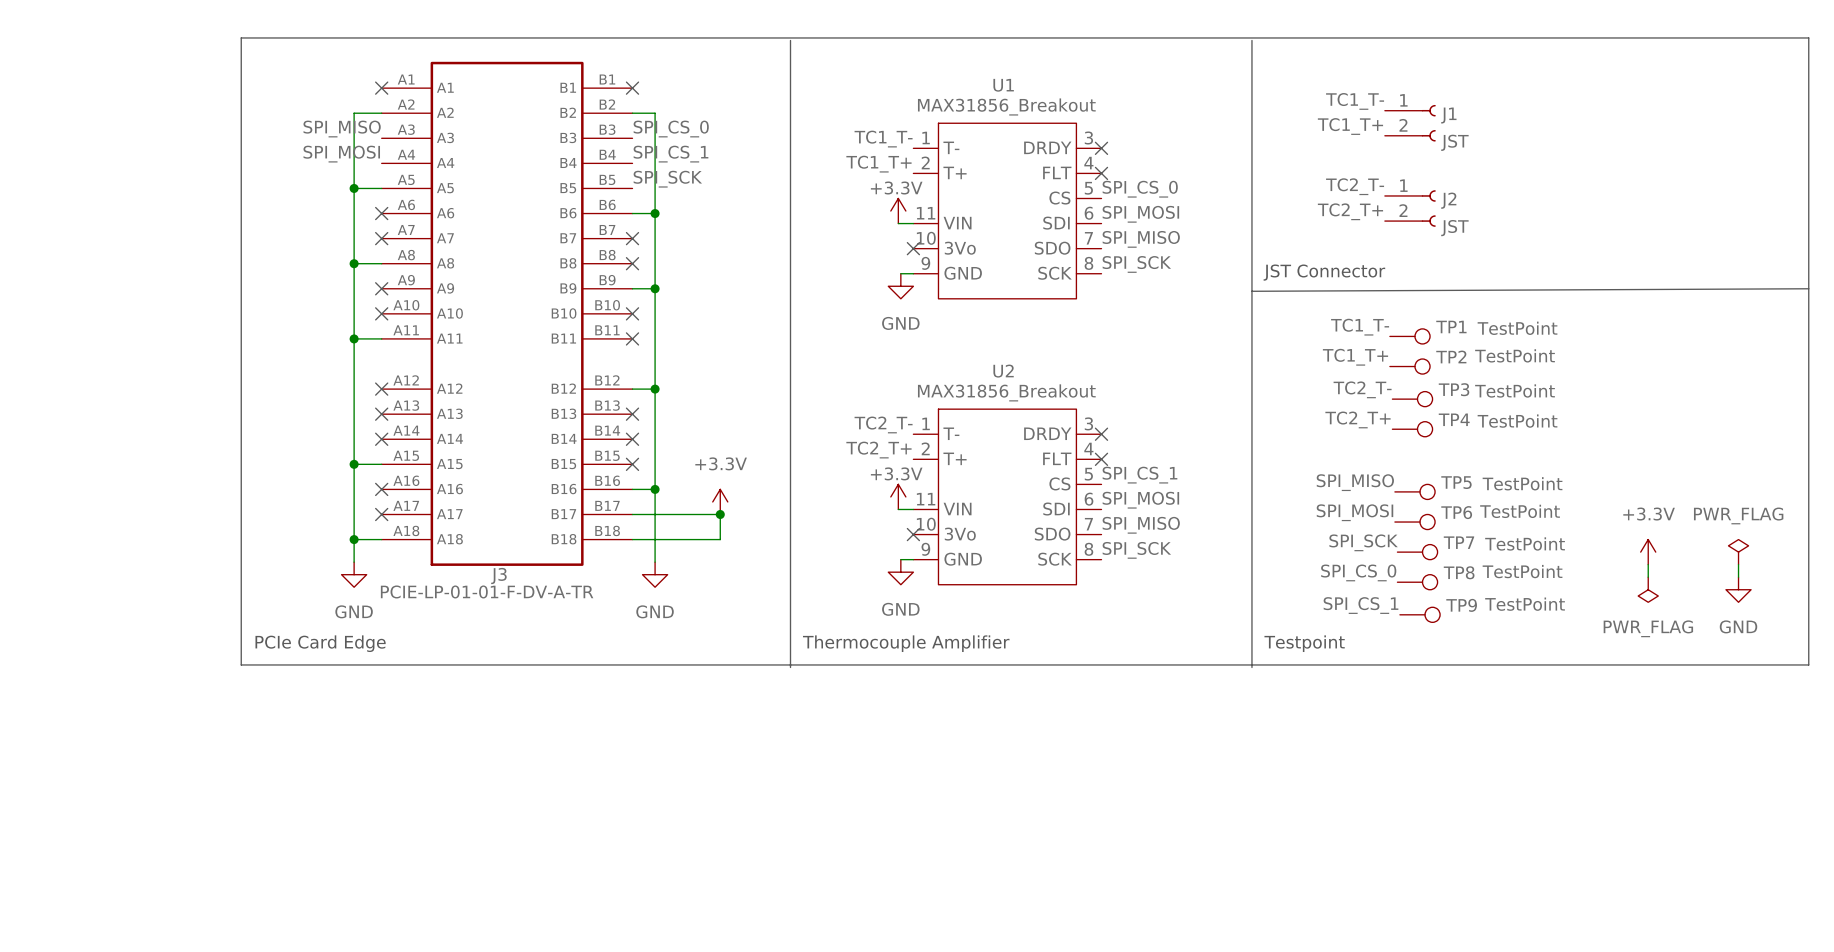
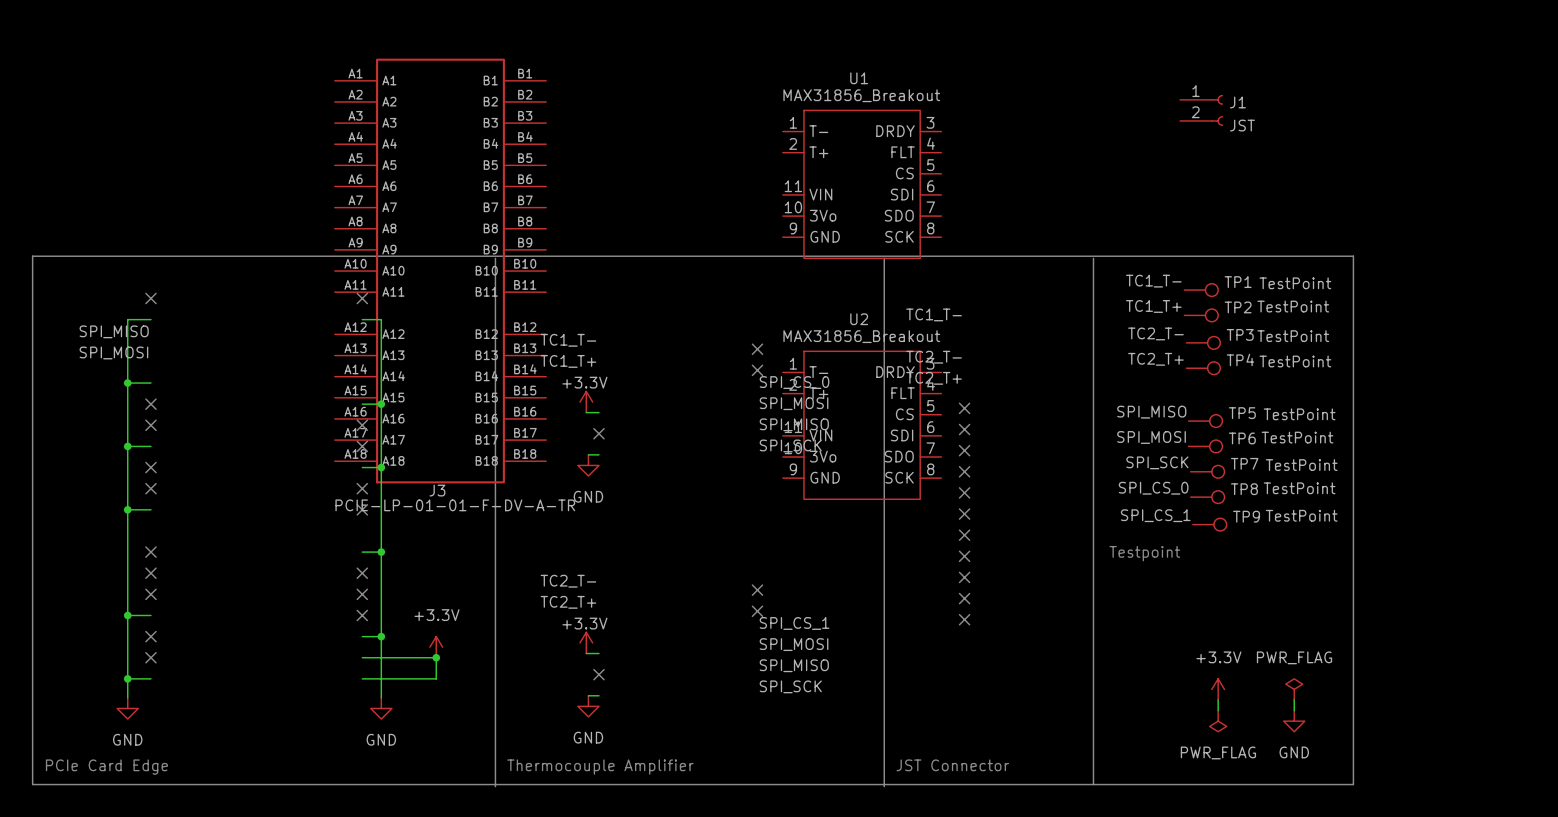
line: (241, 37) (241, 664) (1808, 664) (1808, 37) (241, 37) -> none
line: (790, 40) (790, 667) -> none
line: (1251, 40) (1251, 667) -> none
no-connect mark: (381, 88) -> none
no-connect mark: (632, 88) -> none
label: TC1_T- (1355, 101) -> none
wire: (381, 113) (354, 113) (354, 562) -> none
wire: (632, 113) (655, 113) (655, 562) -> none
label: TC1_T+ (1350, 126) -> none
label: SPI_MISO (342, 129) -> none
label: SPI_CS_0 (671, 129) -> none
label: TC1_T- (883, 139) -> none
no-connect mark: (1101, 148) -> none
label: SPI_MOSI (341, 154) -> none
label: SPI_CS_1 (670, 154) -> none
label: TC1_T+ (878, 164) -> none
no-connect mark: (1101, 173) -> none
label: SPI_SCK (667, 179) -> none
label: TC2_T- (1355, 186) -> none
wire: (354, 188) (381, 188) -> none
junction: (354, 188) -> none
label: SPI_CS_0 (1140, 189) -> none
J2: JST (1410, 208) -> none
power symbol: +3.3V (898, 211) -> none
label: TC2_T+ (1350, 211) -> none
no-connect mark: (381, 213) -> none
wire: (632, 213) (655, 213) -> none
junction: (655, 213) -> none
label: SPI_MOSI (1140, 214) -> none
wire: (898, 223) (913, 223) -> none
no-connect mark: (381, 238) -> none
no-connect mark: (632, 238) -> none
label: SPI_MISO (1141, 239) -> none
no-connect mark: (913, 248) -> none
wire: (354, 263) (381, 263) -> none
junction: (354, 263) -> none
no-connect mark: (632, 263) -> none
label: SPI_SCK (1136, 264) -> none
text: JST Connector (1324, 272) -> none
wire: (900, 273) (913, 273) -> none
power symbol: GND (900, 286) -> none
no-connect mark: (381, 288) -> none
wire: (632, 288) (655, 288) -> none
junction: (655, 288) -> none
line: (1808, 288) (1251, 291) -> none
line: none -> (32, 256) (32, 784) (1353, 784) (1353, 256) (32, 256)
line: none -> (495, 258) (495, 786)
line: none -> (884, 258) (884, 786)
line: none -> (1093, 258) (1093, 784)
no-connect mark: (381, 313) -> none
no-connect mark: (632, 313) -> none
wire: (354, 338) (381, 338) -> none
junction: (354, 338) -> none
no-connect mark: (632, 338) -> none
no-connect mark: none -> (150, 298)
no-connect mark: none -> (362, 298)
label: none -> TC1_T- (934, 314)
wire: none -> (150, 319) (127, 319) (127, 697)
wire: none -> (362, 319) (381, 319) (381, 697)
label: none -> SPI_MISO (114, 331)
no-connect mark: (381, 389) -> none
wire: (632, 389) (655, 389) -> none
junction: (655, 389) -> none
label: none -> TC1_T- (568, 340)
no-connect mark: none -> (757, 349)
label: none -> SPI_MOSI (113, 352)
no-connect mark: (381, 414) -> none
no-connect mark: (632, 414) -> none
label: none -> TC2_T- (934, 357)
label: none -> TC1_T+ (568, 361)
label: TC2_T- (883, 424) -> none
no-connect mark: none -> (757, 370)
no-connect mark: (1101, 434) -> none
no-connect mark: (381, 439) -> none
no-connect mark: (632, 439) -> none
label: none -> TC2_T+ (934, 378)
junction: none -> (127, 383)
label: none -> SPI_CS_0 (794, 382)
label: TC2_T+ (878, 450) -> none
no-connect mark: (1101, 459) -> none
power symbol text position: +3.3V (721, 463) -> +3.3V (584, 382)
wire: (354, 464) (381, 464) -> (127, 383) (150, 383)
junction: (354, 464) -> none
no-connect mark: (632, 464) -> none
no-connect mark: none -> (150, 404)
junction: none -> (381, 404)
label: none -> SPI_MOSI (794, 403)
label: SPI_CS_1 (1139, 475) -> none
no-connect mark: none -> (964, 408)
no-connect mark: (381, 489) -> none
wire: (632, 489) (655, 489) -> (362, 404) (381, 404)
junction: (655, 489) -> none
no-connect mark: none -> (150, 425)
no-connect mark: none -> (362, 425)
power symbol: +3.3V (898, 496) -> none
label: none -> SPI_MISO (794, 424)
label: SPI_MOSI (1140, 500) -> none
power symbol position: +3.3V (720, 501) -> +3.3V (586, 402)
no-connect mark: none -> (964, 429)
no-connect mark: none -> (598, 433)
wire: (898, 509) (913, 509) -> (586, 412) (598, 412)
no-connect mark: (381, 514) -> none
wire: (632, 514) (720, 514) (720, 539) (632, 539) -> none
junction: (720, 514) -> none
junction: none -> (127, 446)
no-connect mark: none -> (362, 446)
label: none -> SPI_SCK (790, 445)
label: SPI_MISO (1141, 525) -> none
no-connect mark: none -> (964, 450)
no-connect mark: (913, 534) -> none
wire: (354, 539) (381, 539) -> (127, 446) (150, 446)
junction: (354, 539) -> none
no-connect mark: none -> (150, 467)
wire: none -> (362, 467) (381, 467)
junction: none -> (381, 467)
label: SPI_SCK (1136, 550) -> none
no-connect mark: none -> (964, 471)
power symbol: +3.3V (1648, 552) -> none
power symbol: PWR_FLAG (1738, 552) -> none
wire: (900, 559) (913, 559) -> (588, 454) (598, 454)
wire: (1648, 564) (1648, 577) -> none
wire: (1738, 564) (1738, 577) -> none
no-connect mark: none -> (150, 488)
no-connect mark: none -> (362, 488)
power symbol: GND (900, 572) -> none
power symbol: GND (354, 574) -> none
power symbol position: GND (655, 574) -> GND (588, 465)
no-connect mark: none -> (964, 492)
power symbol: PWR_FLAG (1648, 589) -> none
power symbol: GND (1738, 589) -> none
wire: none -> (127, 509) (150, 509)
junction: none -> (127, 509)
no-connect mark: none -> (362, 509)
no-connect mark: none -> (964, 514)
no-connect mark: none -> (964, 535)
text: PCIe Card Edge (320, 643) -> none
text: Thermocouple Amplifier (906, 643) -> none
text position: Testpoint (1304, 643) -> Testpoint (1144, 553)
no-connect mark: none -> (150, 552)
wire: none -> (362, 552) (381, 552)
junction: none -> (381, 552)
no-connect mark: none -> (964, 556)
no-connect mark: none -> (150, 573)
no-connect mark: none -> (362, 573)
no-connect mark: none -> (964, 577)
label: none -> TC2_T- (568, 581)
no-connect mark: none -> (757, 590)
no-connect mark: none -> (150, 594)
no-connect mark: none -> (362, 594)
no-connect mark: none -> (964, 598)
label: none -> TC2_T+ (568, 602)
no-connect mark: none -> (757, 611)
wire: none -> (127, 615) (150, 615)
junction: none -> (127, 615)
no-connect mark: none -> (362, 615)
no-connect mark: none -> (964, 619)
label: none -> SPI_CS_1 (794, 623)
no-connect mark: none -> (150, 636)
wire: none -> (362, 636) (381, 636)
junction: none -> (381, 636)
power symbol: none -> +3.3V (586, 642)
label: none -> SPI_MOSI (794, 644)
power symbol: none -> +3.3V (436, 647)
wire: none -> (586, 653) (598, 653)
no-connect mark: none -> (150, 657)
wire: none -> (362, 657) (436, 657) (436, 678) (362, 678)
junction: none -> (436, 657)
label: none -> SPI_MISO (794, 665)
no-connect mark: none -> (598, 674)
wire: none -> (127, 678) (150, 678)
junction: none -> (127, 678)
label: none -> SPI_SCK (790, 686)
power symbol: none -> +3.3V (1218, 689)
power symbol: none -> PWR_FLAG (1294, 689)
wire: none -> (588, 695) (598, 695)
wire: none -> (1218, 700) (1218, 710)
wire: none -> (1294, 700) (1294, 710)
power symbol: none -> GND (588, 706)
power symbol: none -> GND (127, 708)
power symbol: none -> GND (381, 708)
power symbol: none -> PWR_FLAG (1218, 721)
power symbol: none -> GND (1294, 721)
text: none -> PCIe Card Edge (106, 767)
text: none -> Thermocouple Amplifier (600, 767)
text: none -> JST Connector (952, 765)

